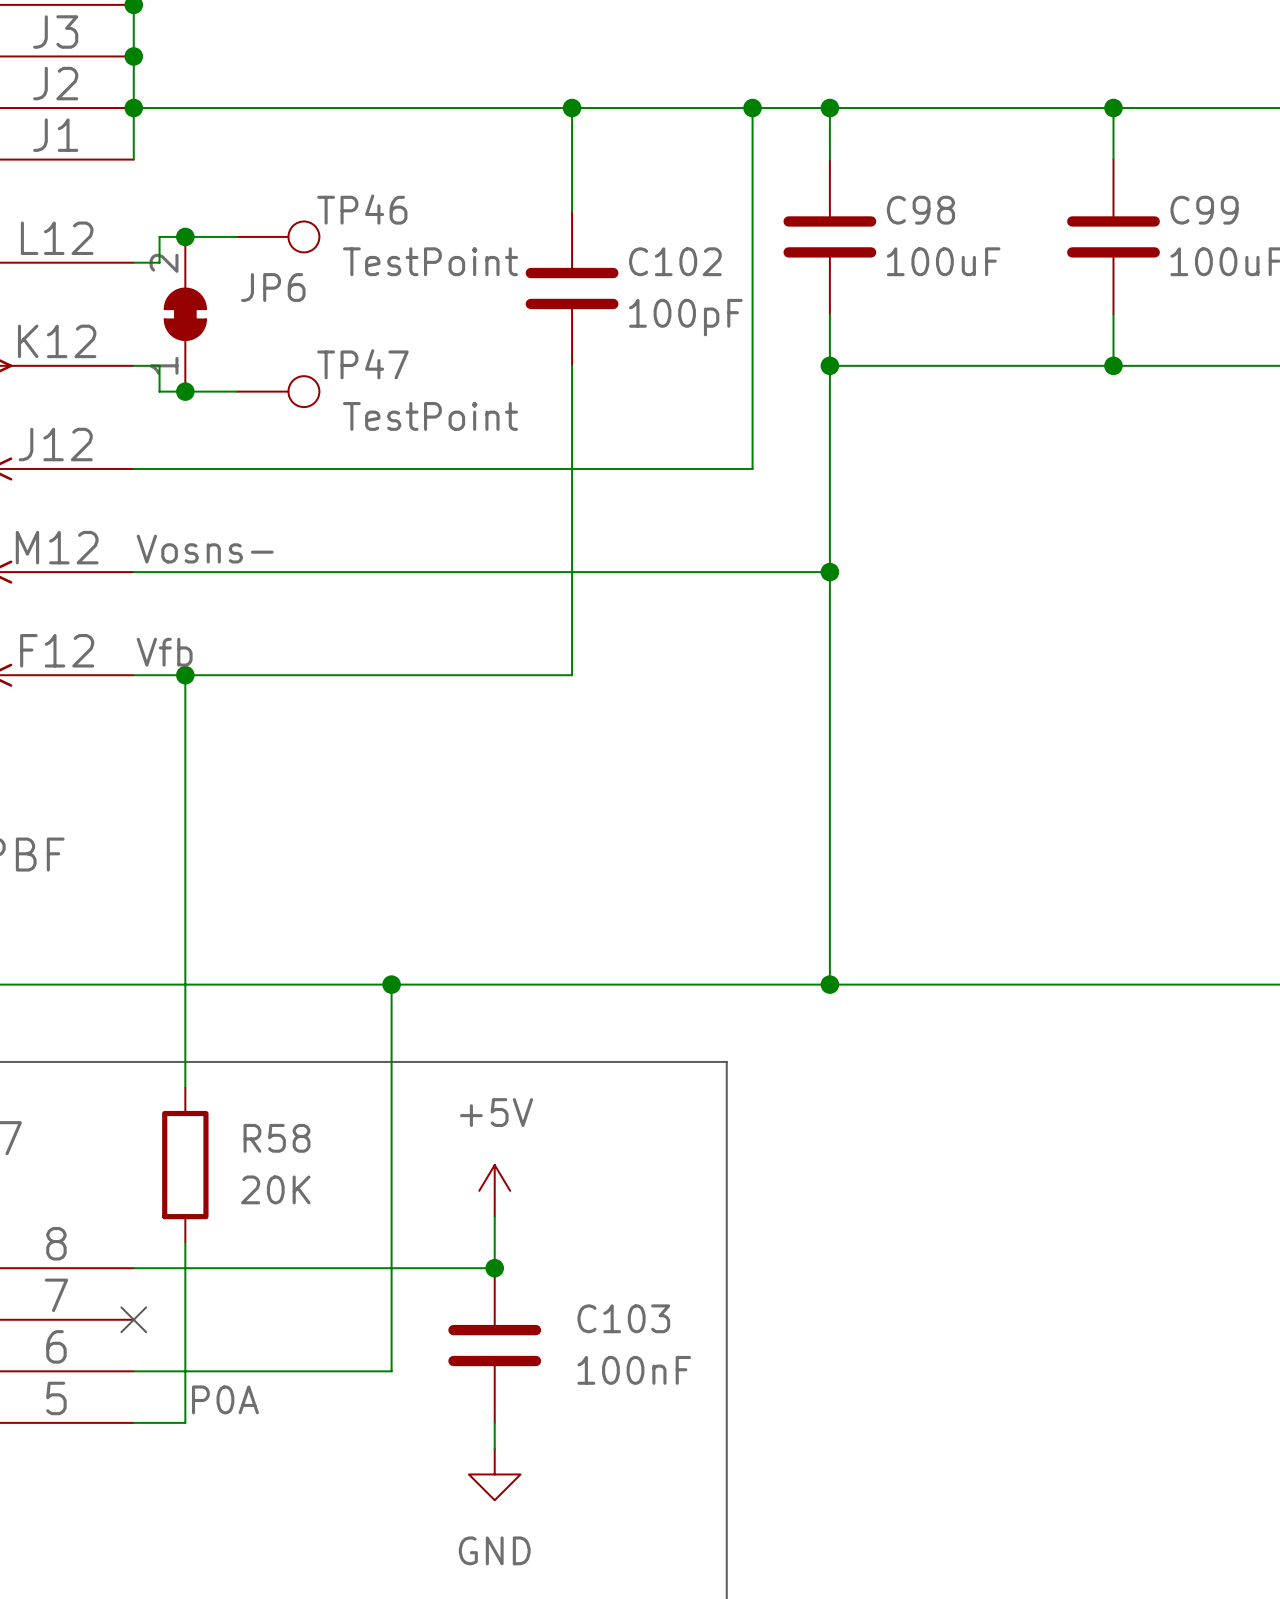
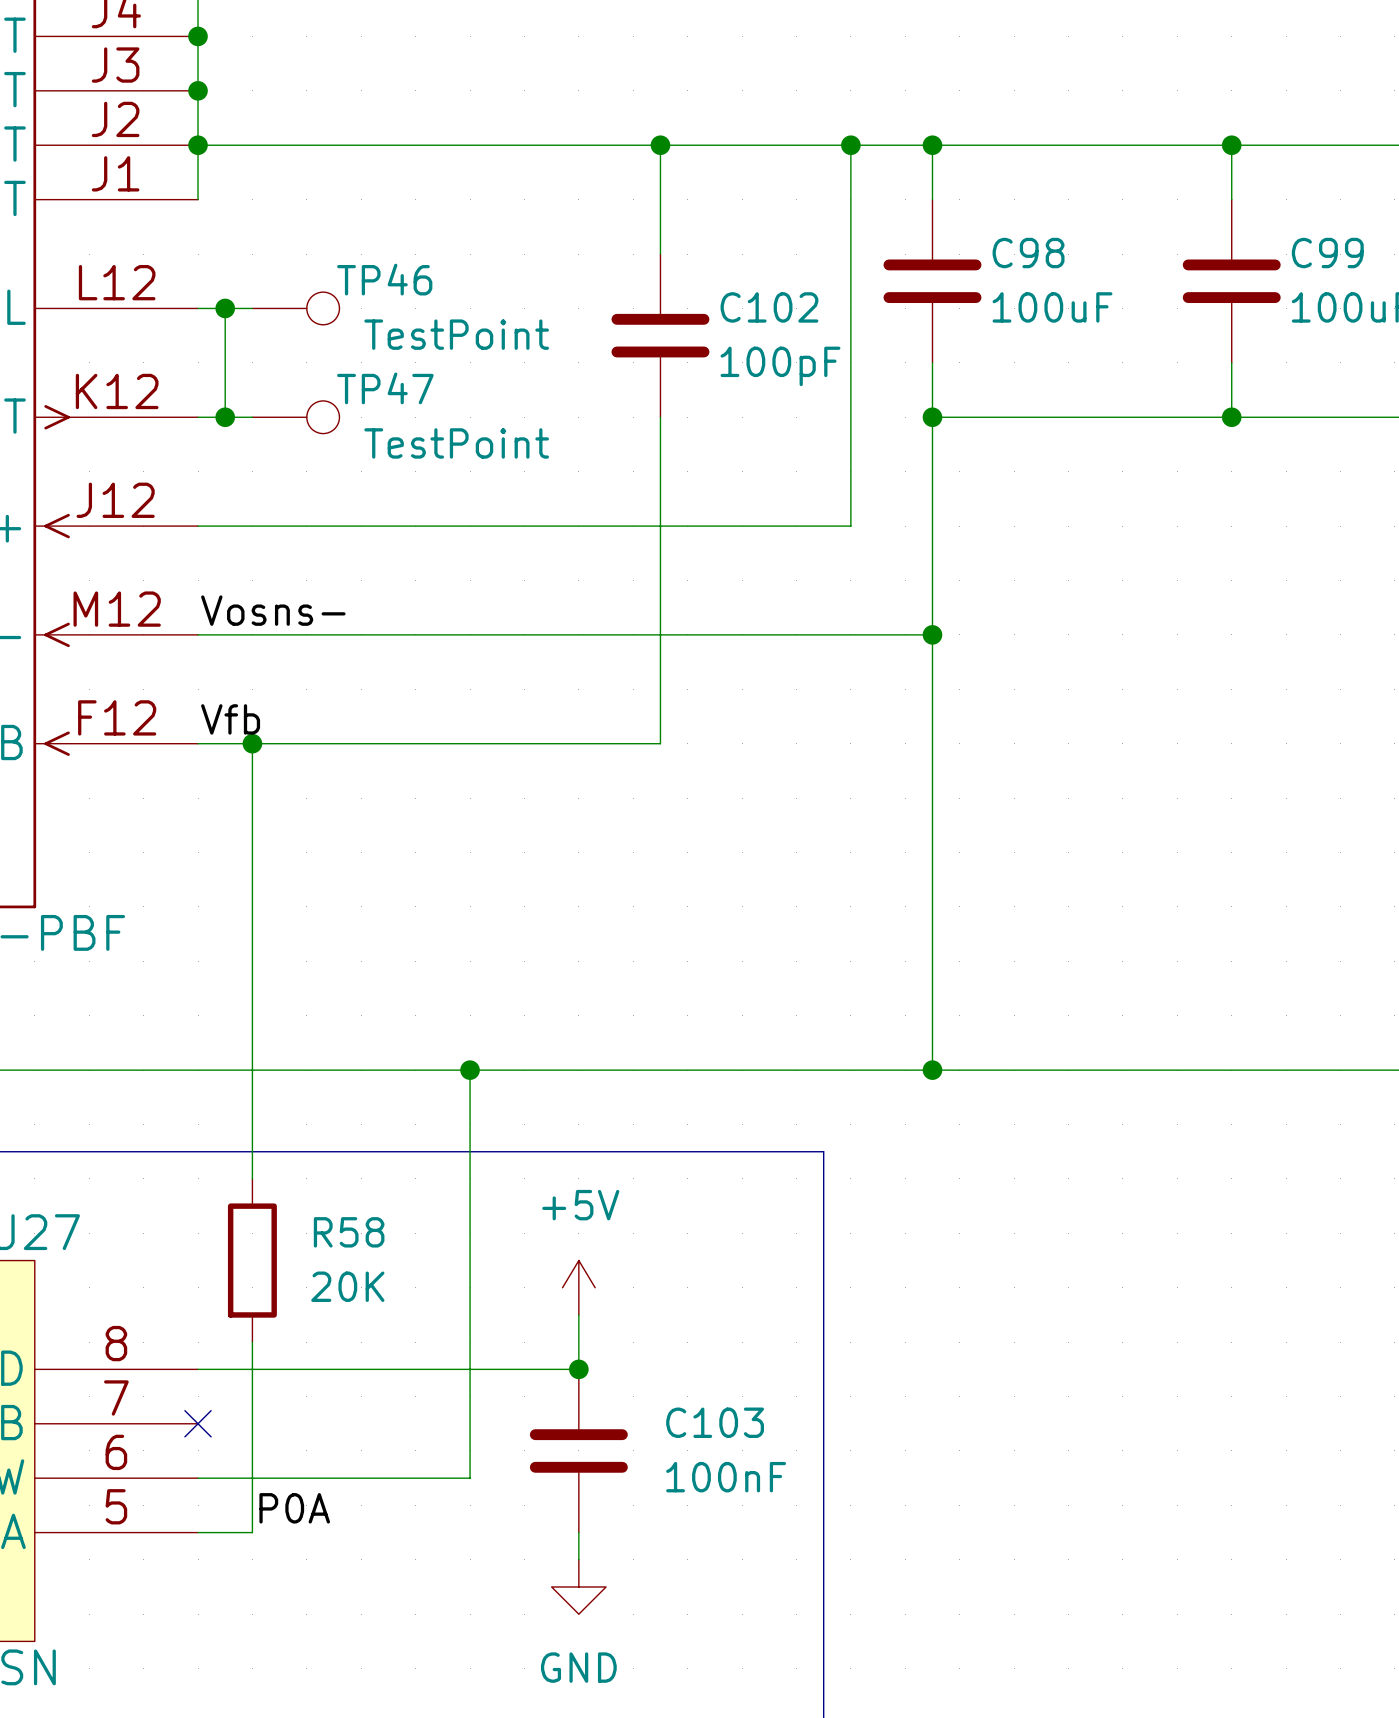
junction position: (185, 236) -> (225, 308)
wire: (236, 236) (159, 236) (159, 262) -> none
TP46 position: (278, 236) -> (295, 308)
wire: none -> (252, 308) (225, 308) (225, 417) (252, 417)
JP6: (185, 314) -> none
wire: (159, 365) (159, 391) (236, 391) -> none
junction position: (185, 391) -> (225, 417)
TP47 position: (278, 391) -> (295, 417)

